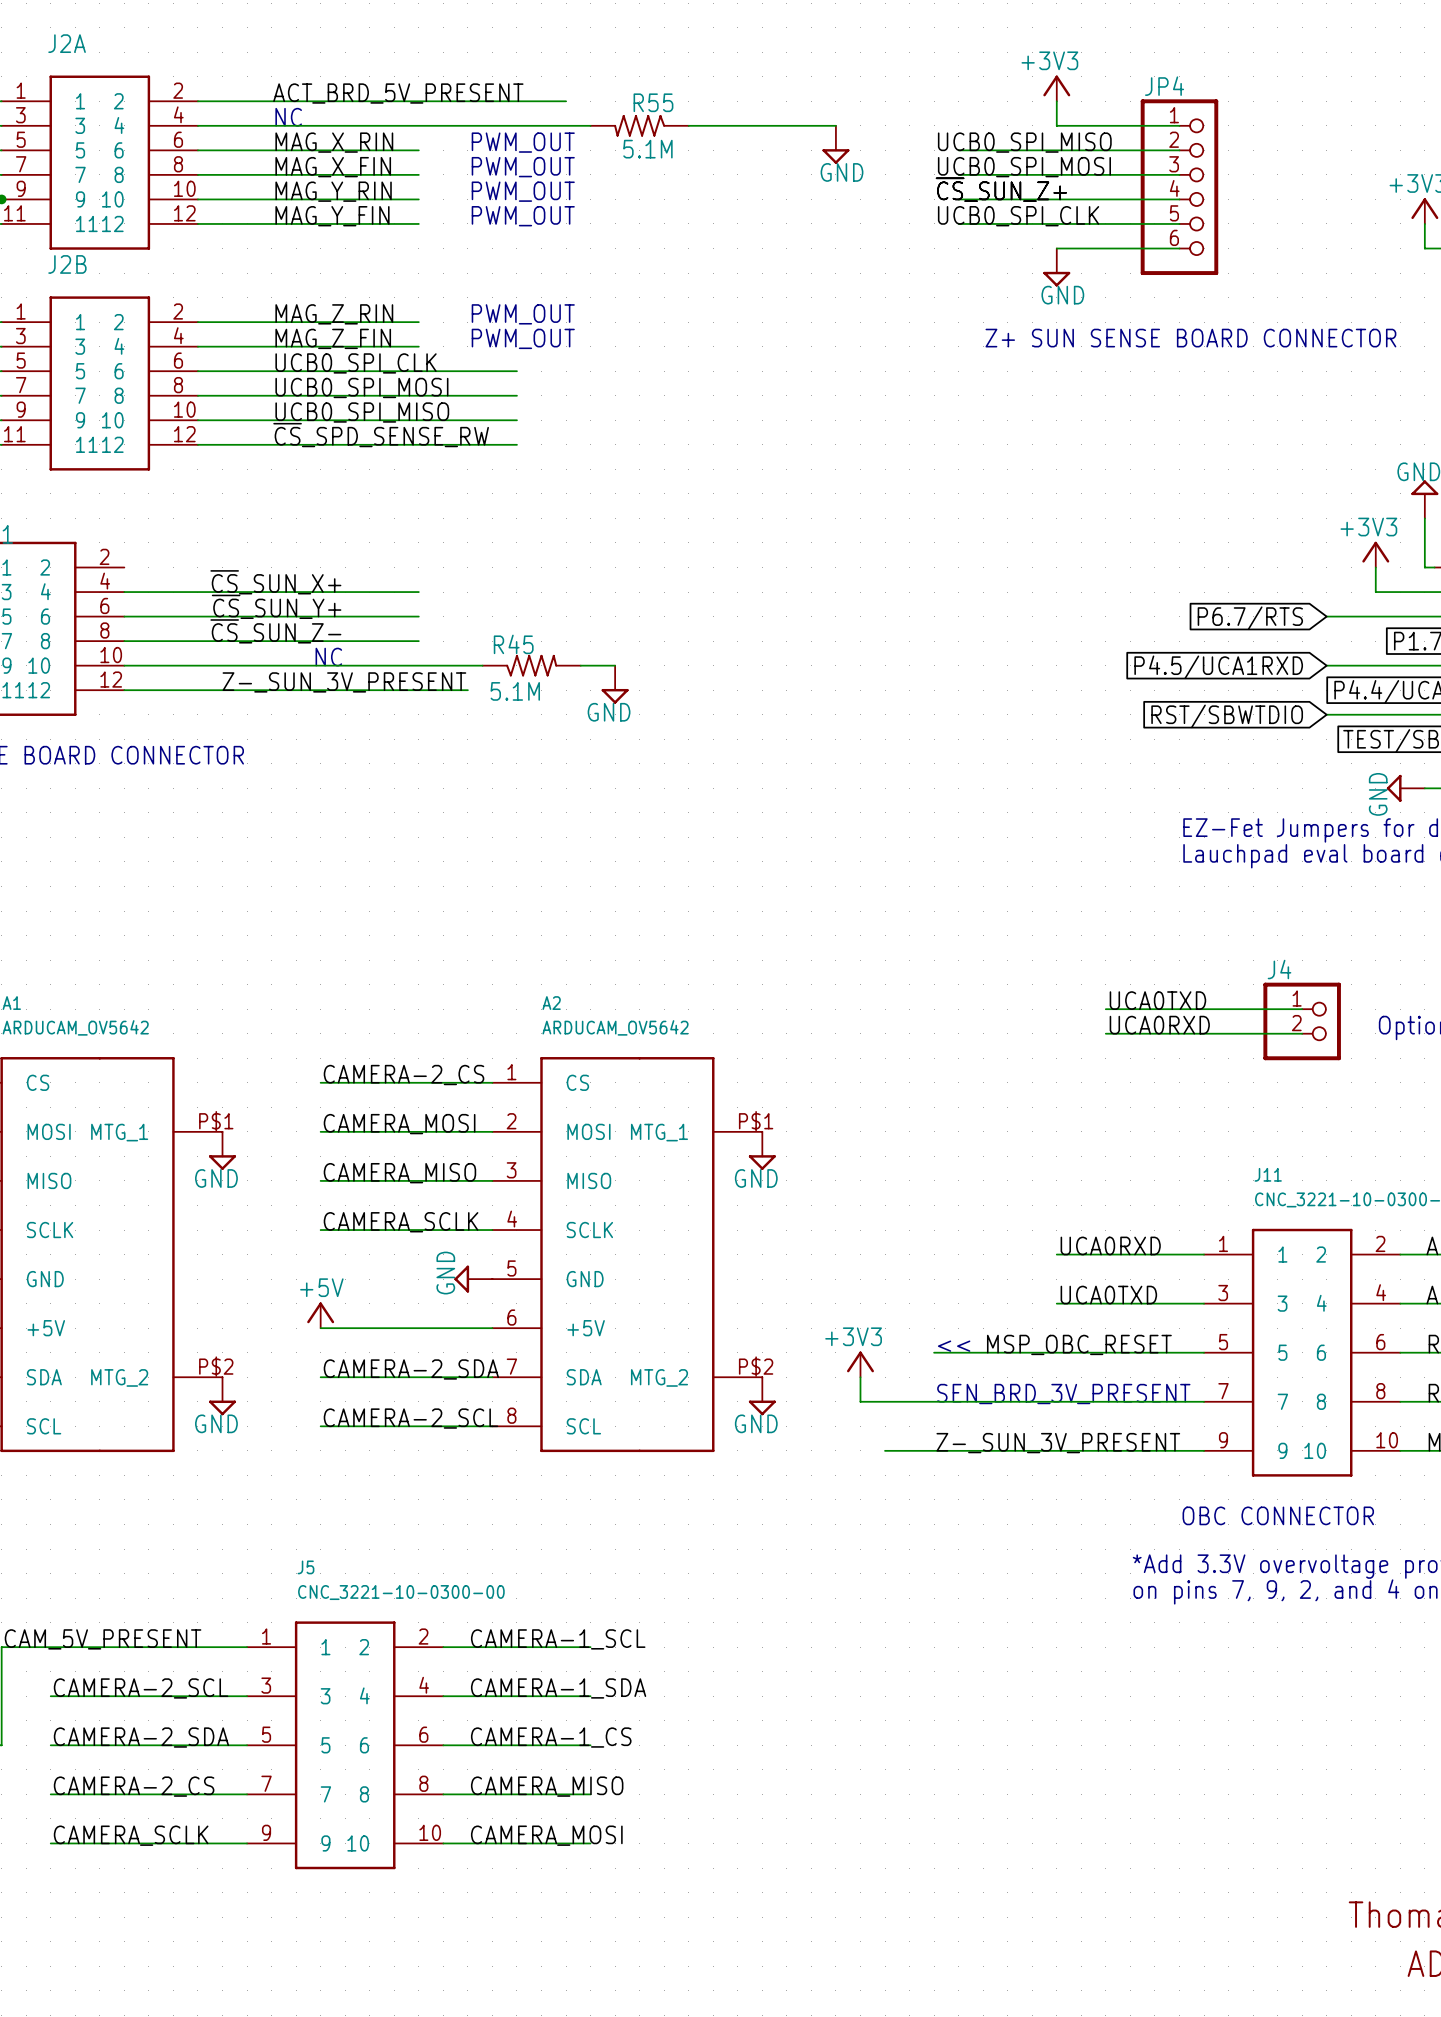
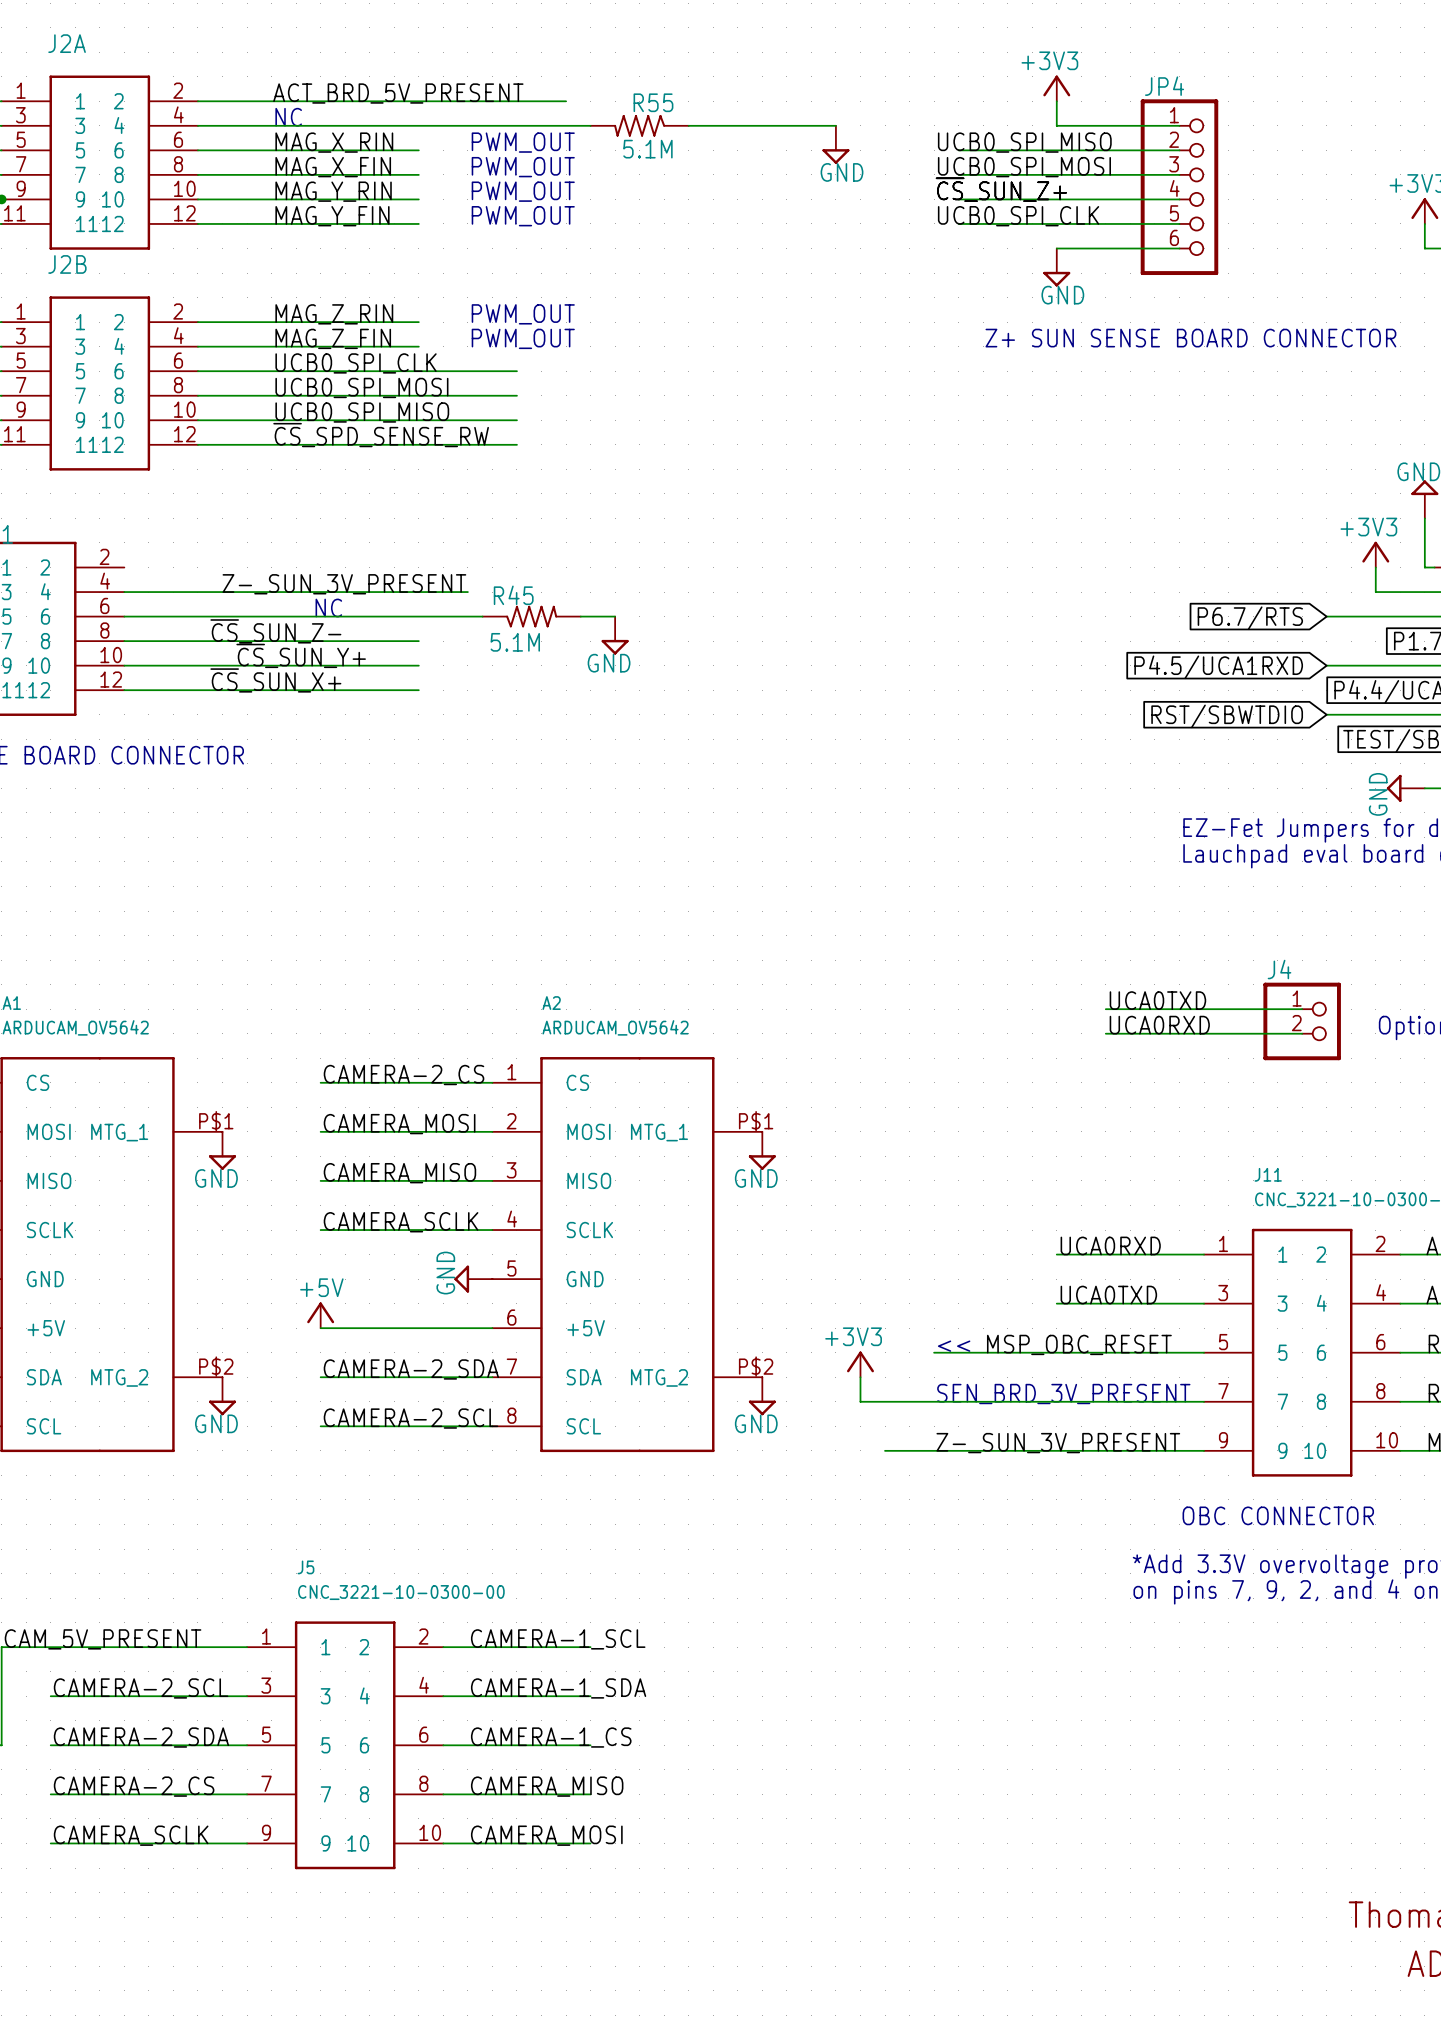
label position: ~{CS}_SUN_X+ (275, 582) -> ~{CS}_SUN_X+ (275, 680)
label position: ~{CS}_SUN_Y+ (276, 606) -> ~{CS}_SUN_Y+ (301, 655)
text position: NC (328, 657) -> NC (328, 607)
wire: (418, 665) (482, 665) -> (418, 616) (482, 616)
R45 position: (531, 665) -> (531, 616)
wire: (580, 665) (615, 665) -> (580, 616) (615, 616)
label position: Z-_SUN_3V_PRESENT (344, 682) -> Z-_SUN_3V_PRESENT (344, 584)
power symbol position: GND (615, 684) -> GND (615, 635)
wire: (418, 690) (467, 690) -> (418, 592) (467, 592)

